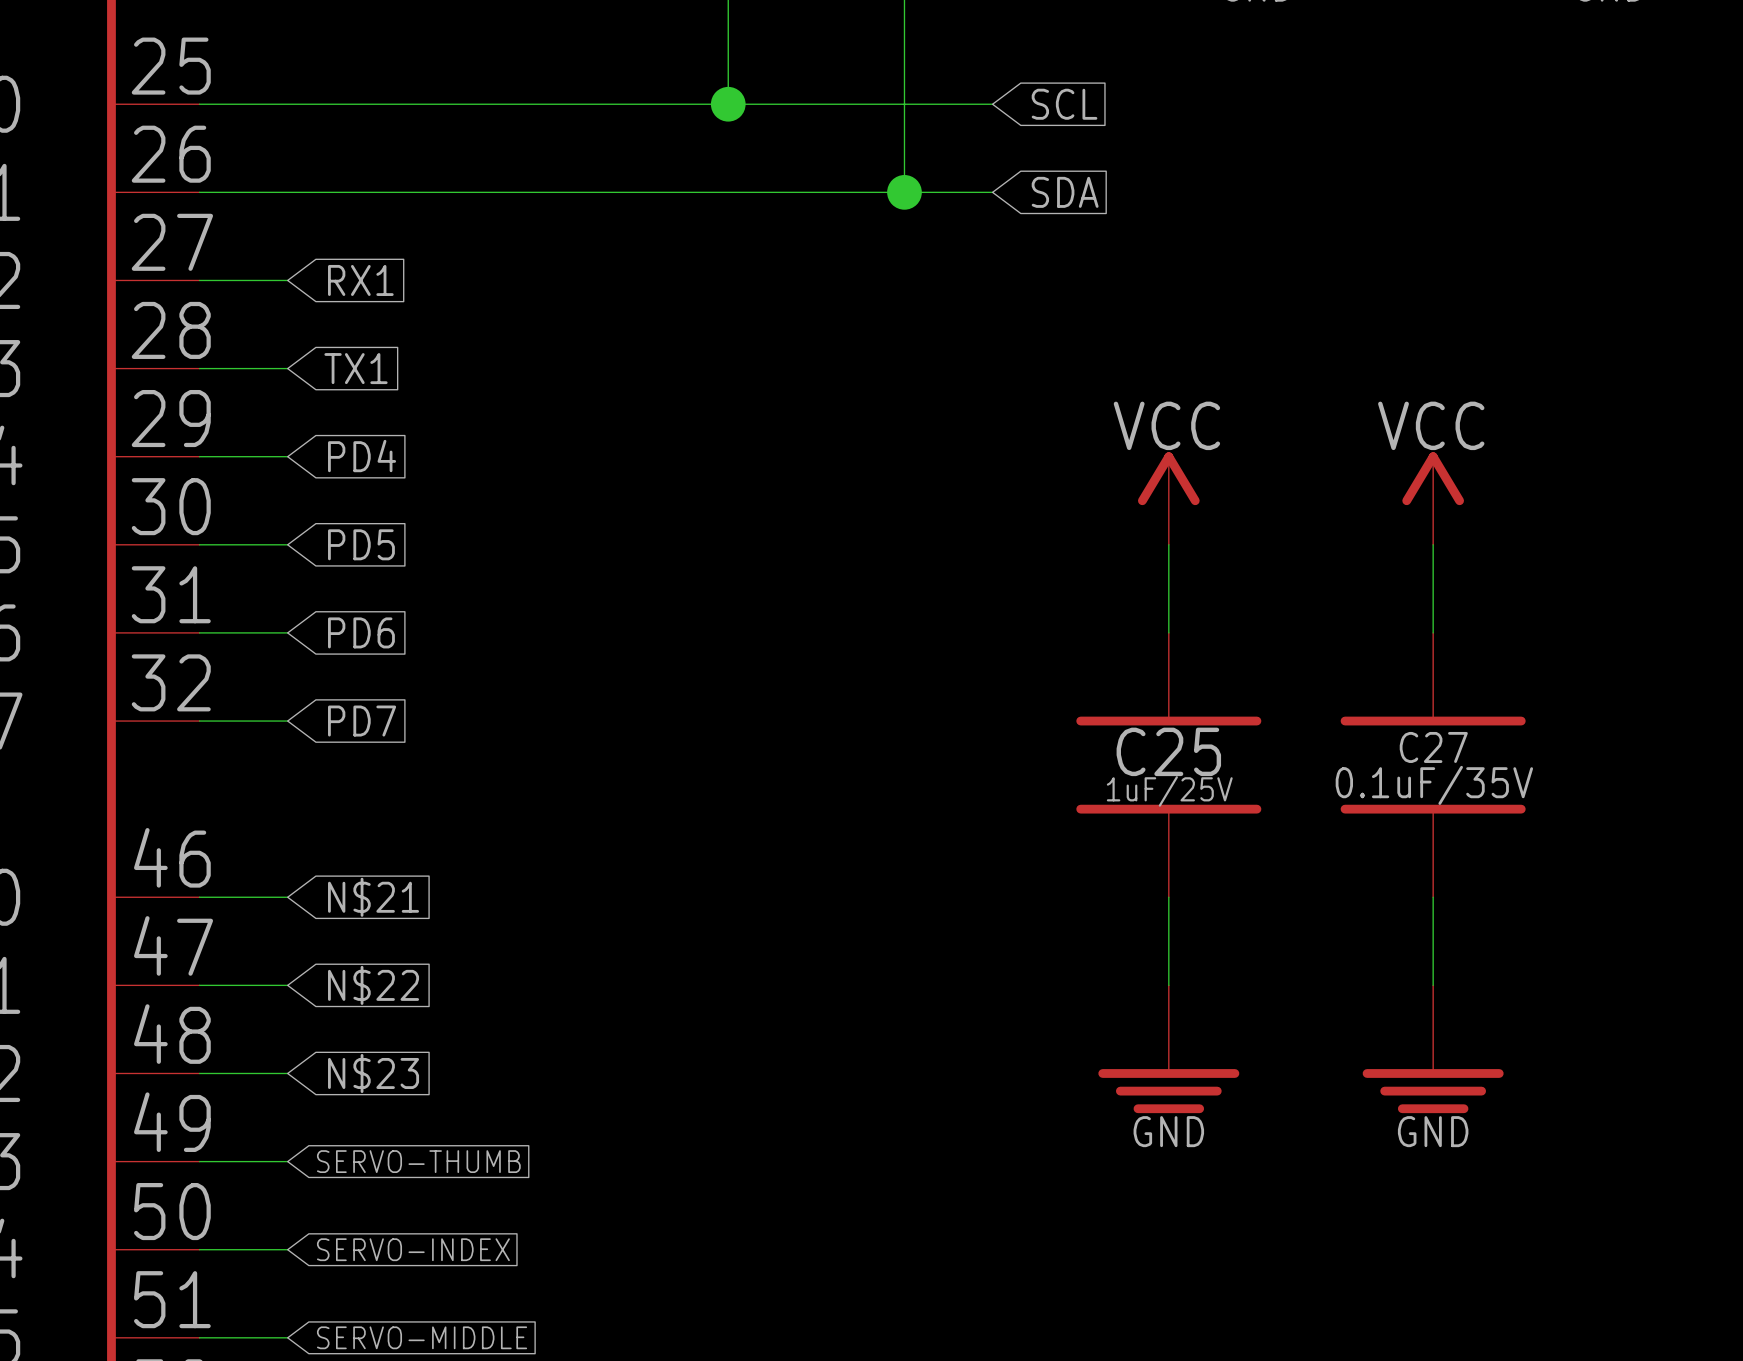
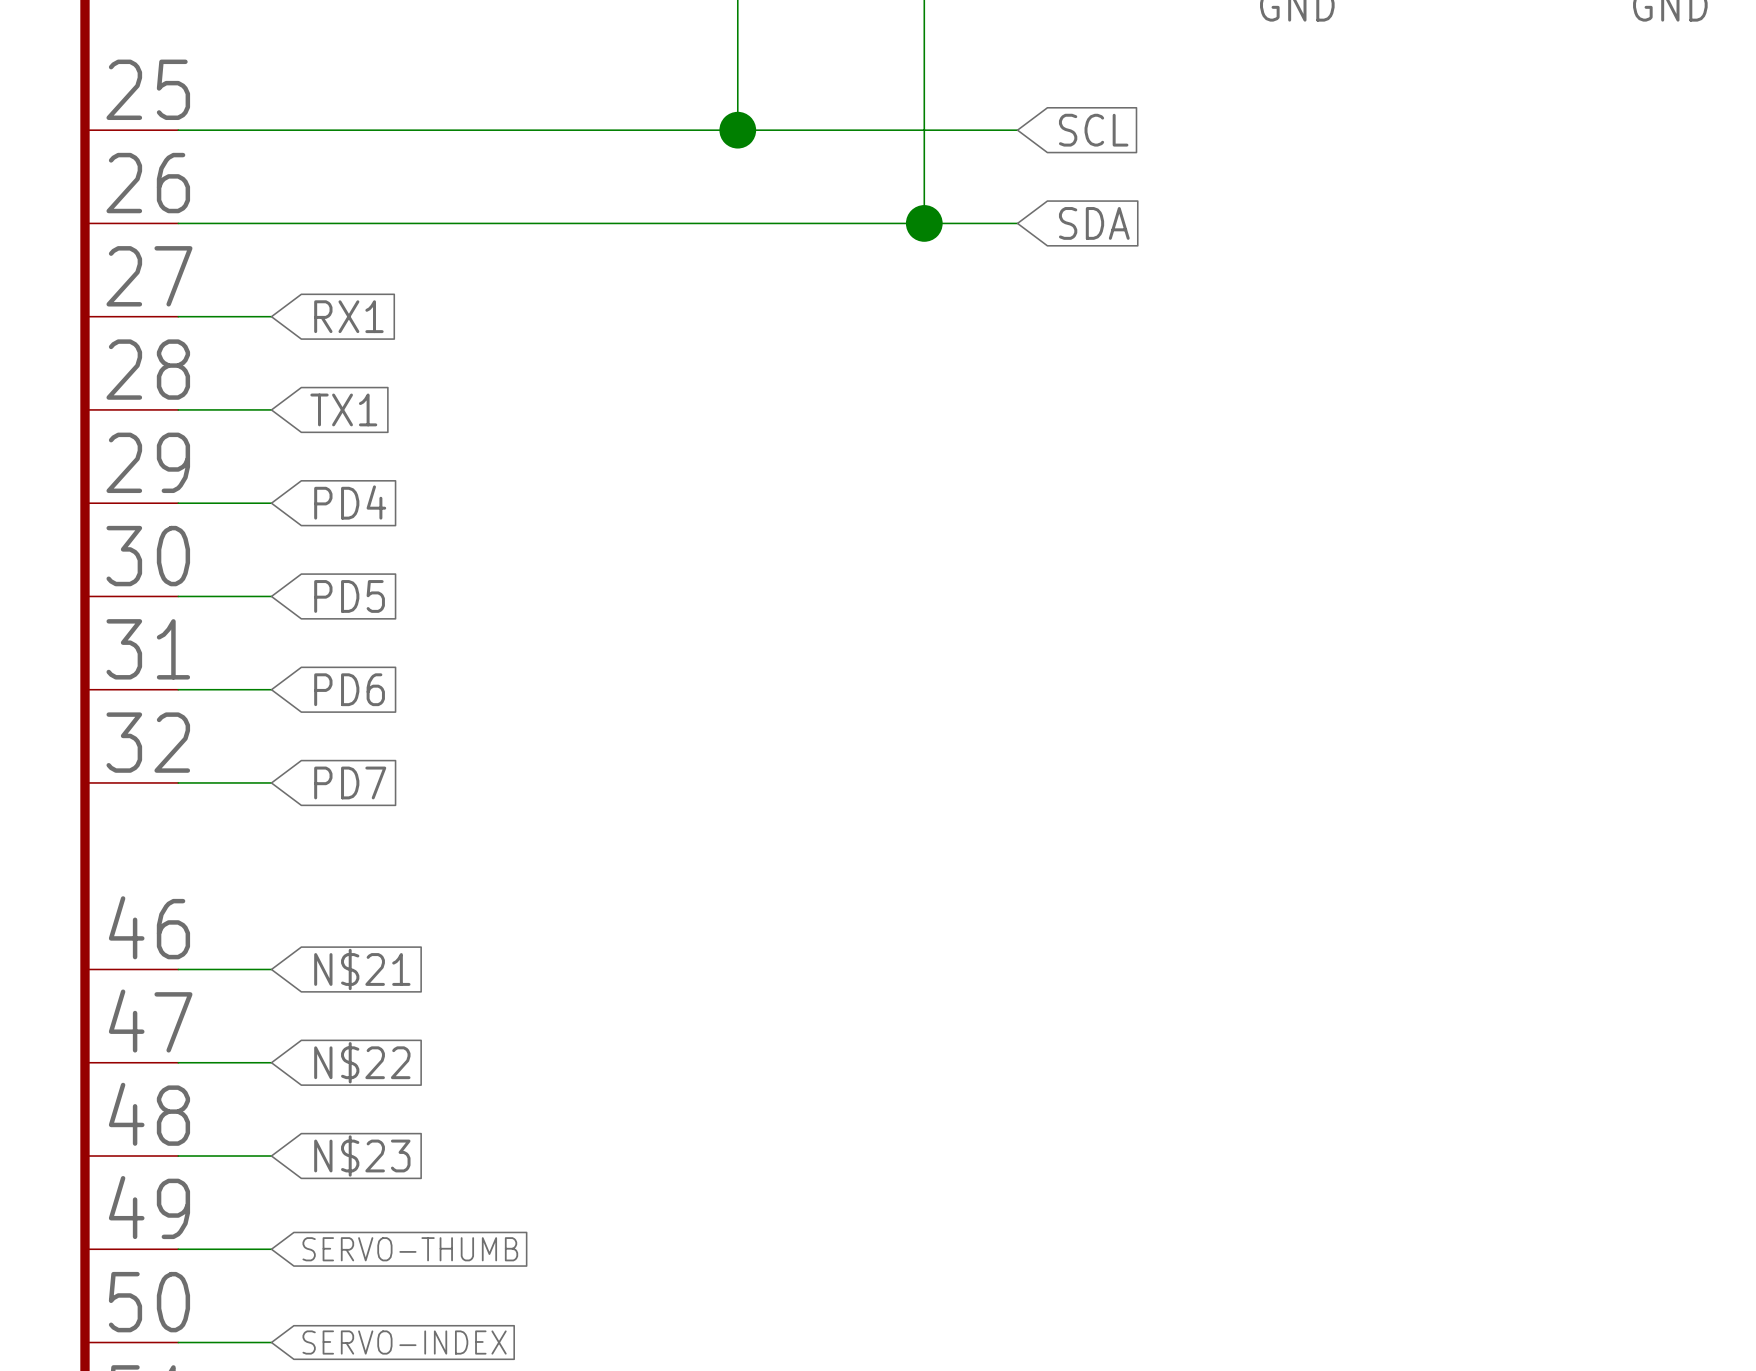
power symbol: (1168, 498) -> none
power symbol: (1433, 498) -> none
wire: (1168, 544) (1168, 632) -> none
wire: (1433, 544) (1433, 632) -> none
C25: 1uF/25V (1168, 765) -> none
C27: 0.1uF/35V (1433, 765) -> none
wire: (1168, 897) (1168, 985) -> none
wire: (1433, 897) (1433, 985) -> none
power symbol: (1168, 1049) -> none
power symbol: (1433, 1049) -> none

